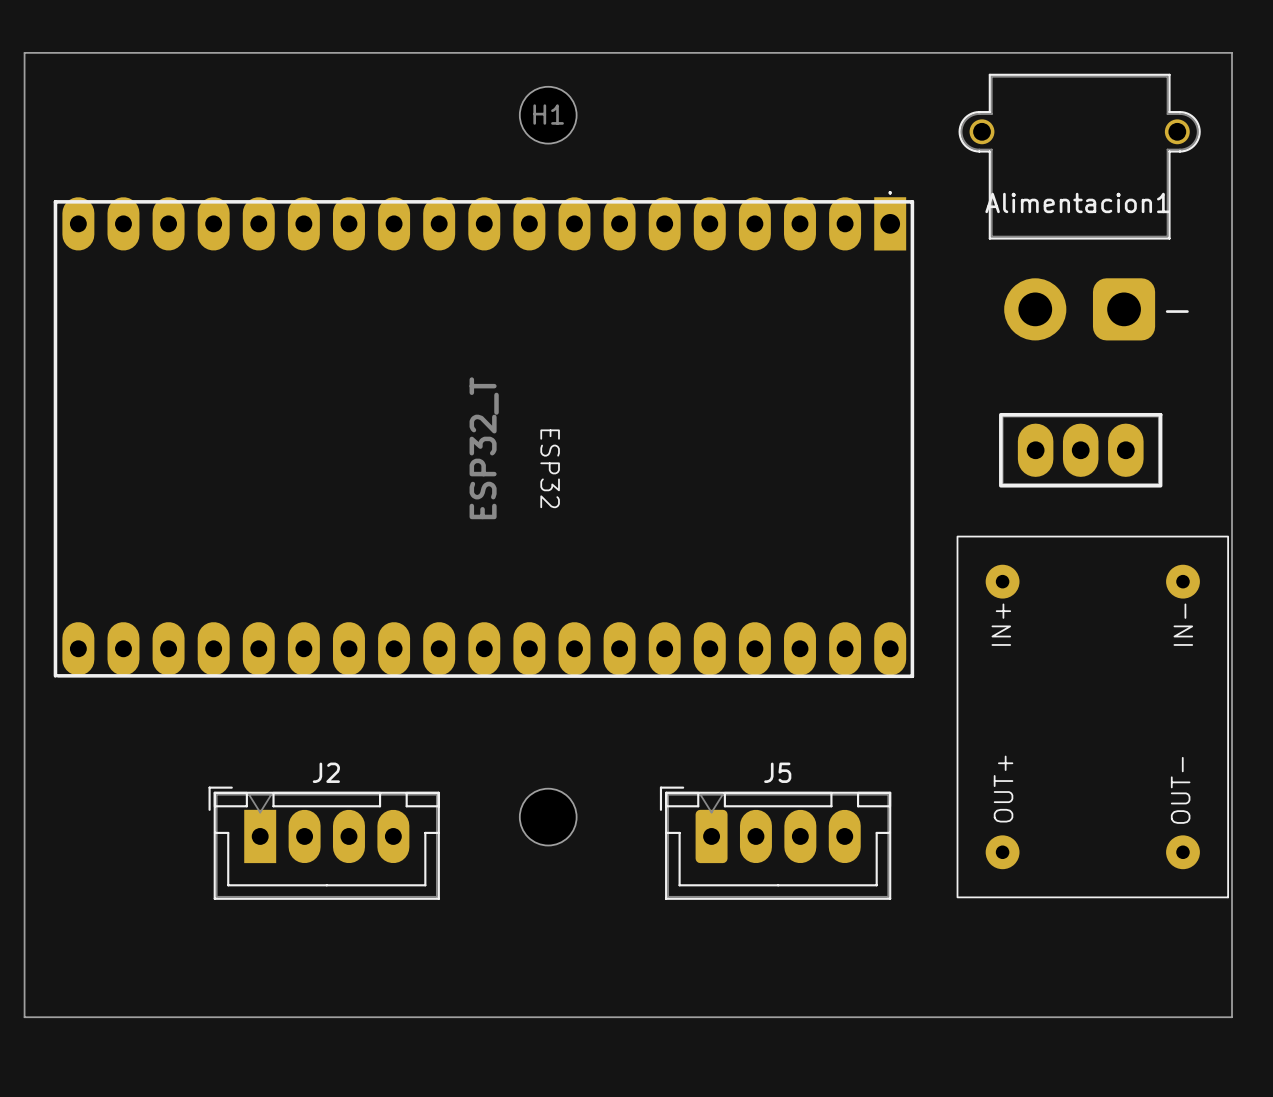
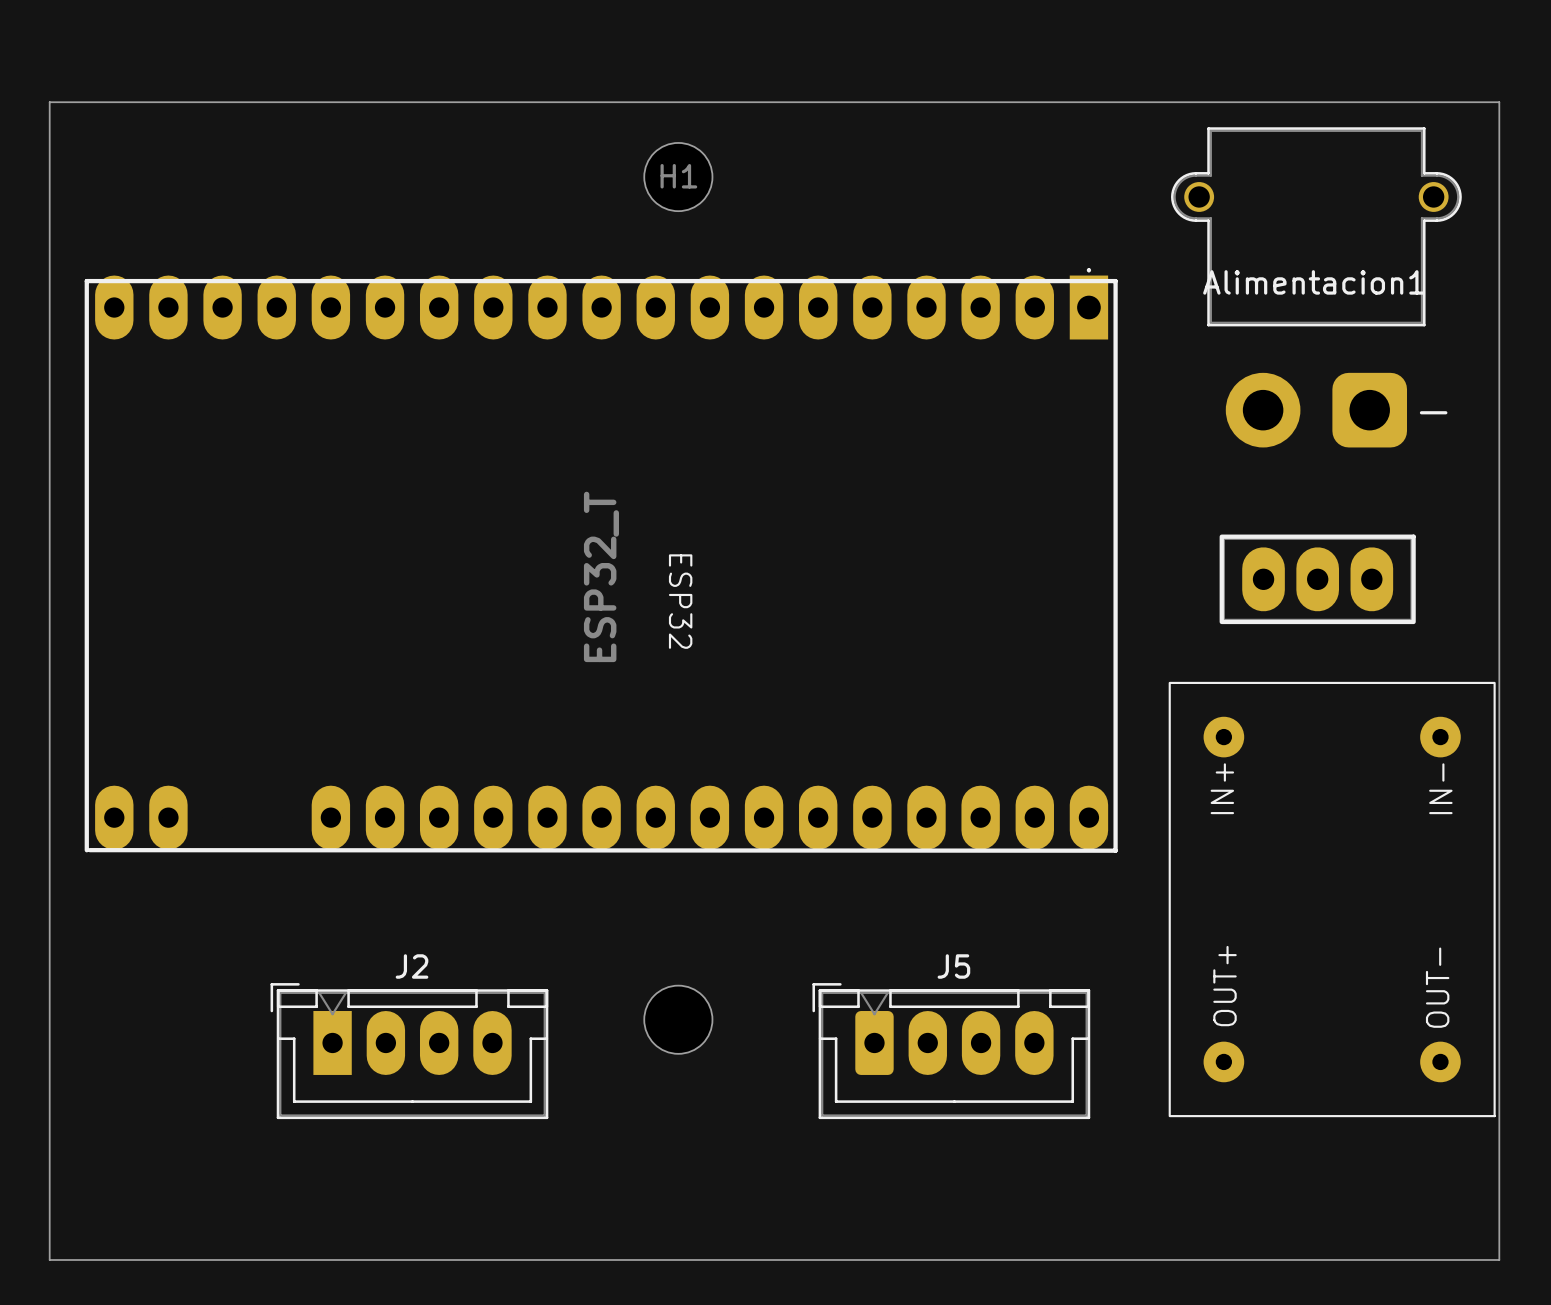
ESP32 footprint: [53, 191, 915, 679] -> [84, 268, 1118, 853]

